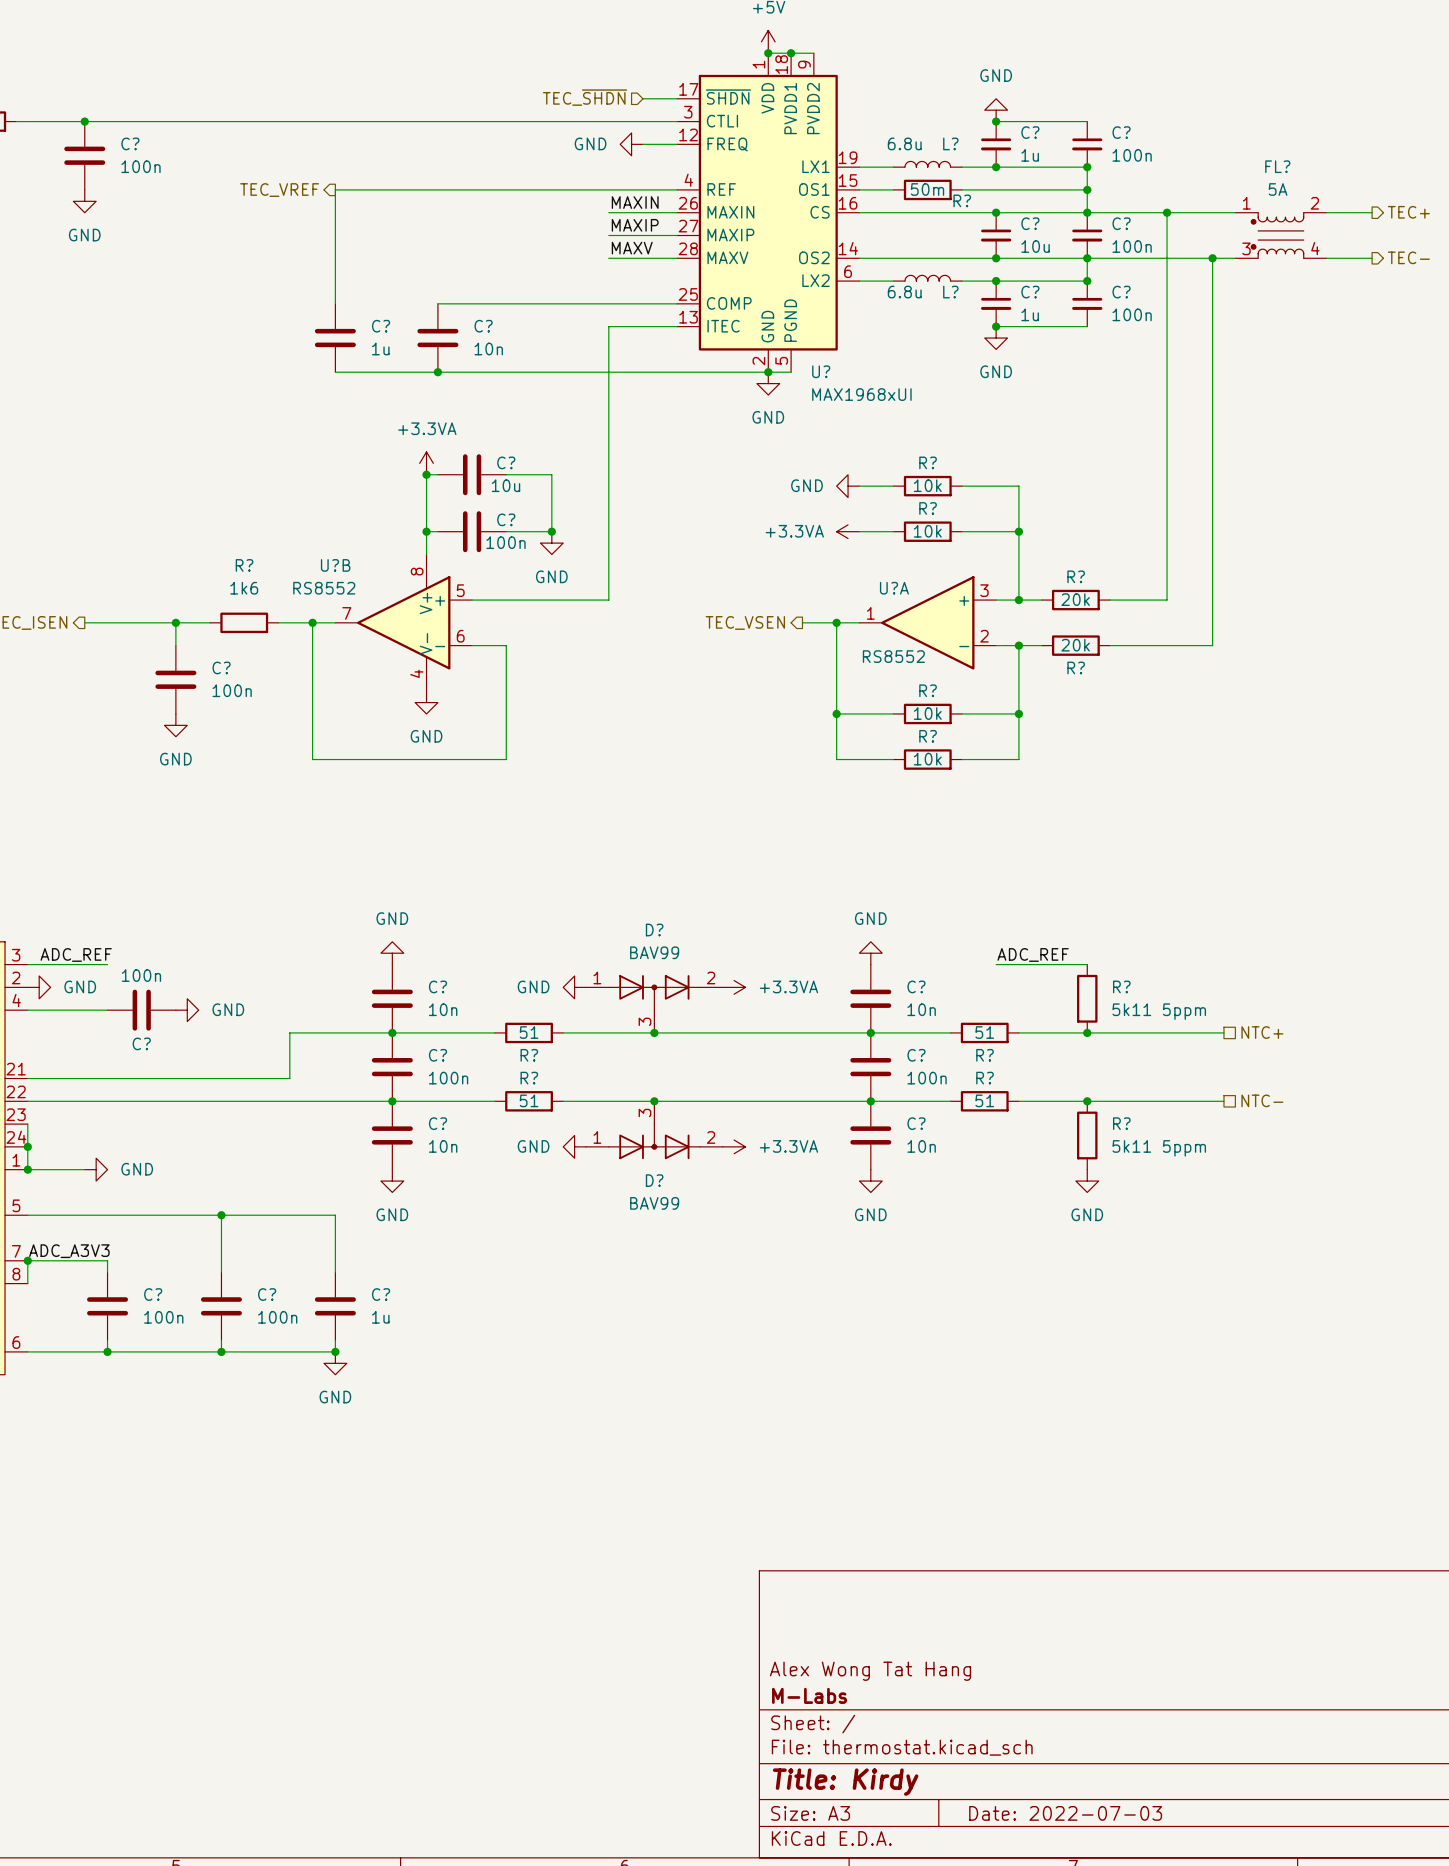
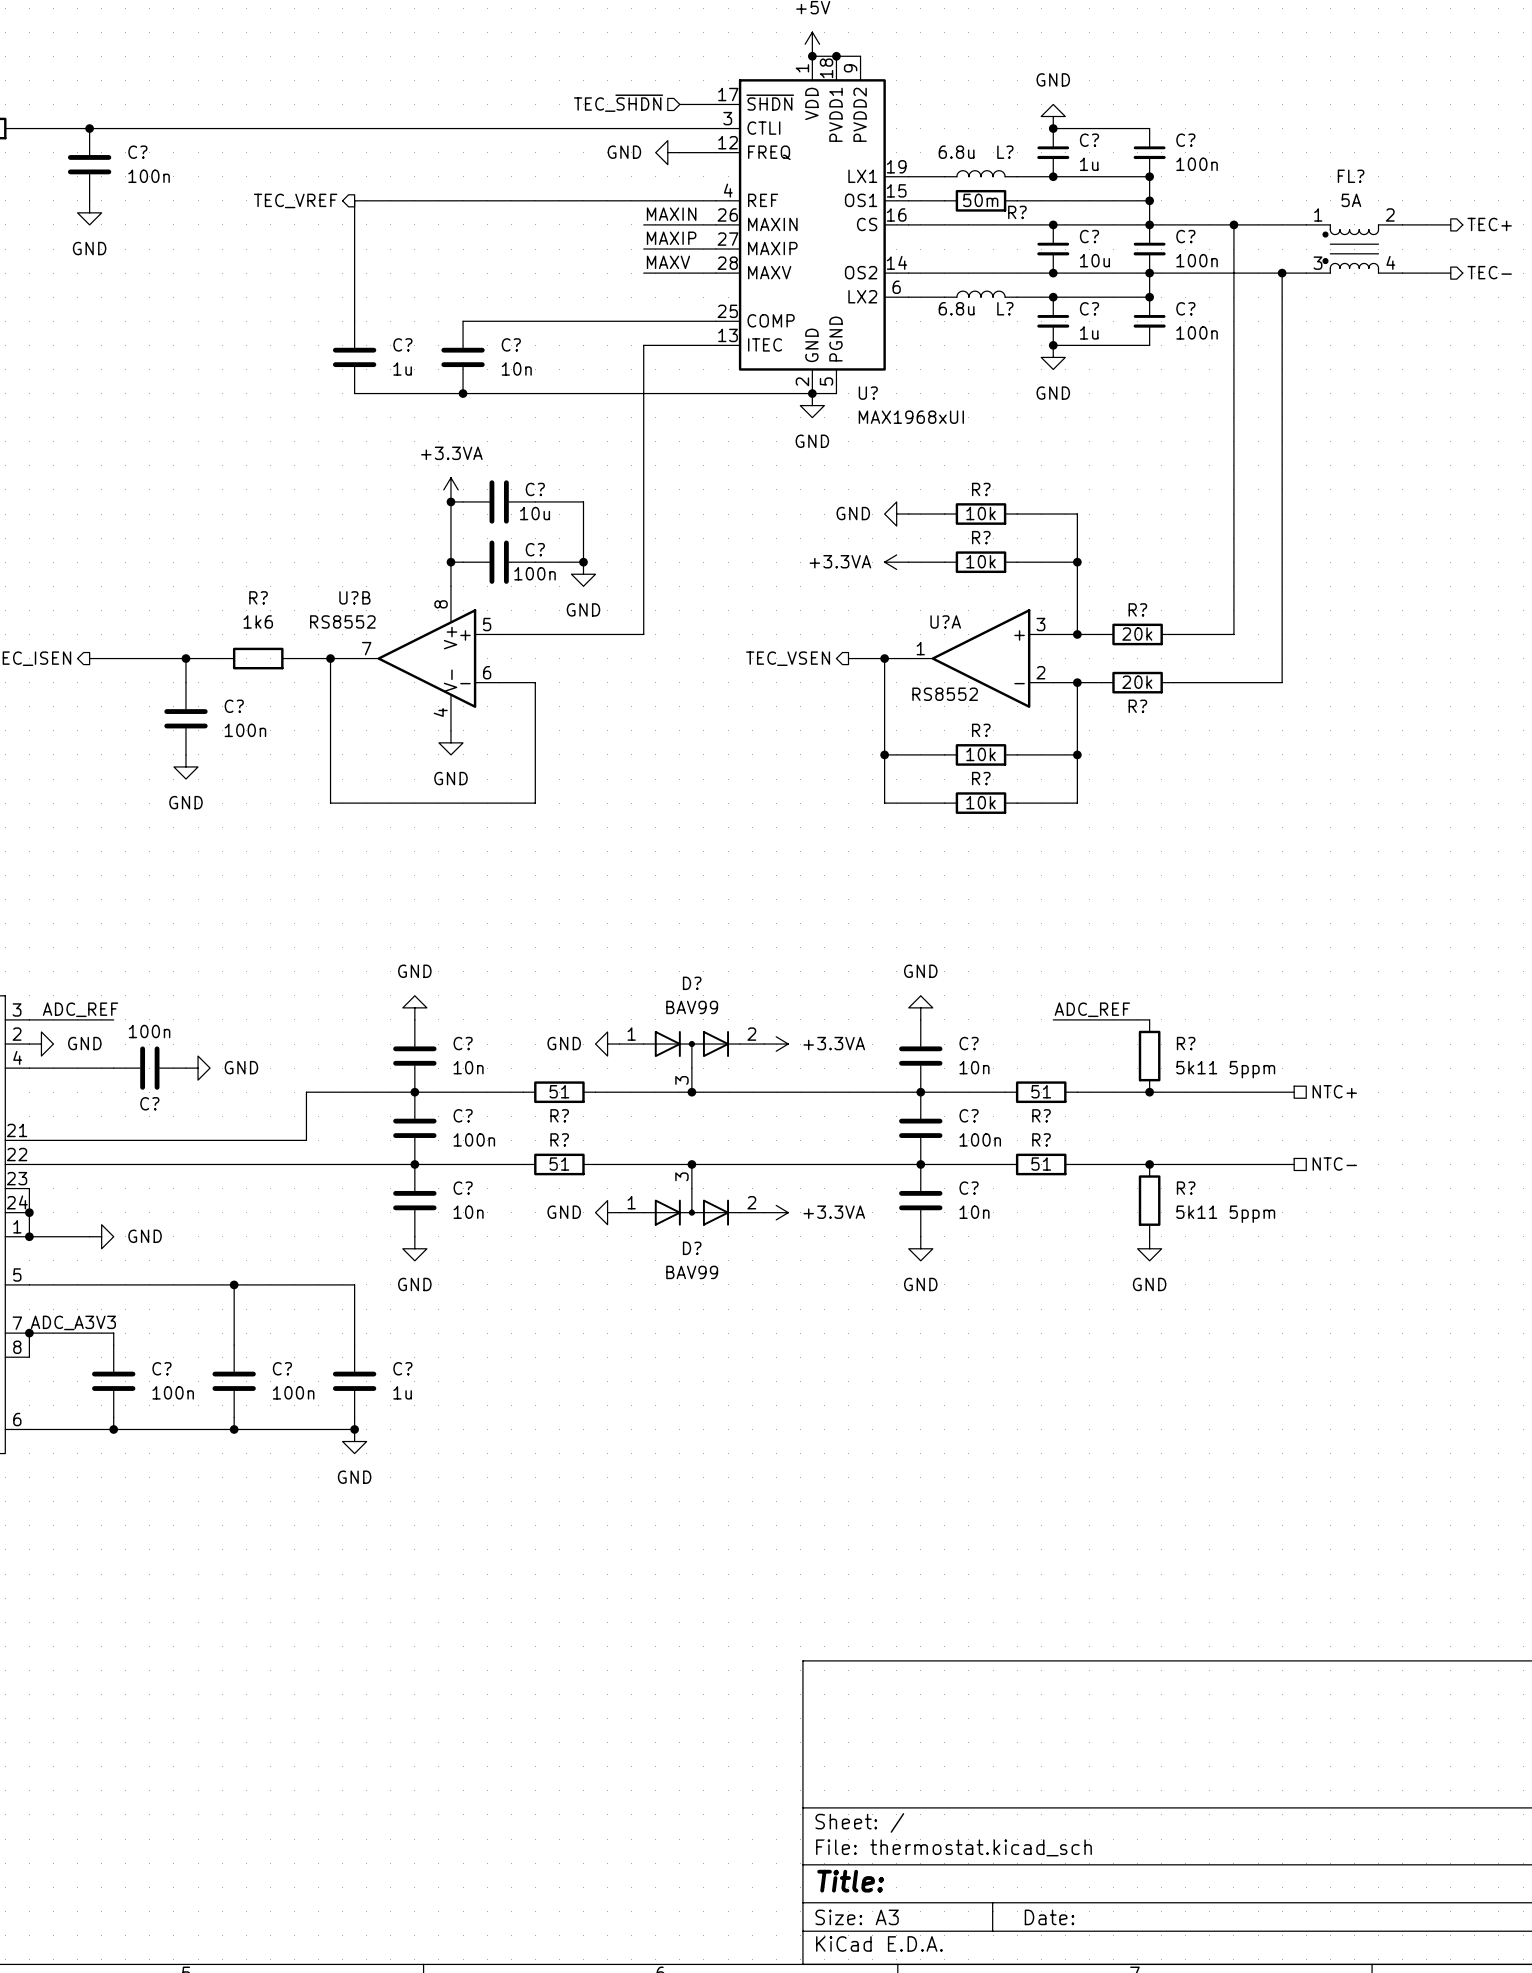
title block: Alex Wong Tat Hang (870, 1671) -> none
title block: M-Labs (809, 1695) -> none
title block: Title: Kirdy (845, 1782) -> Title: (850, 1881)
title block: Date: 2022-07-03 (1065, 1813) -> Date: (1049, 1917)

